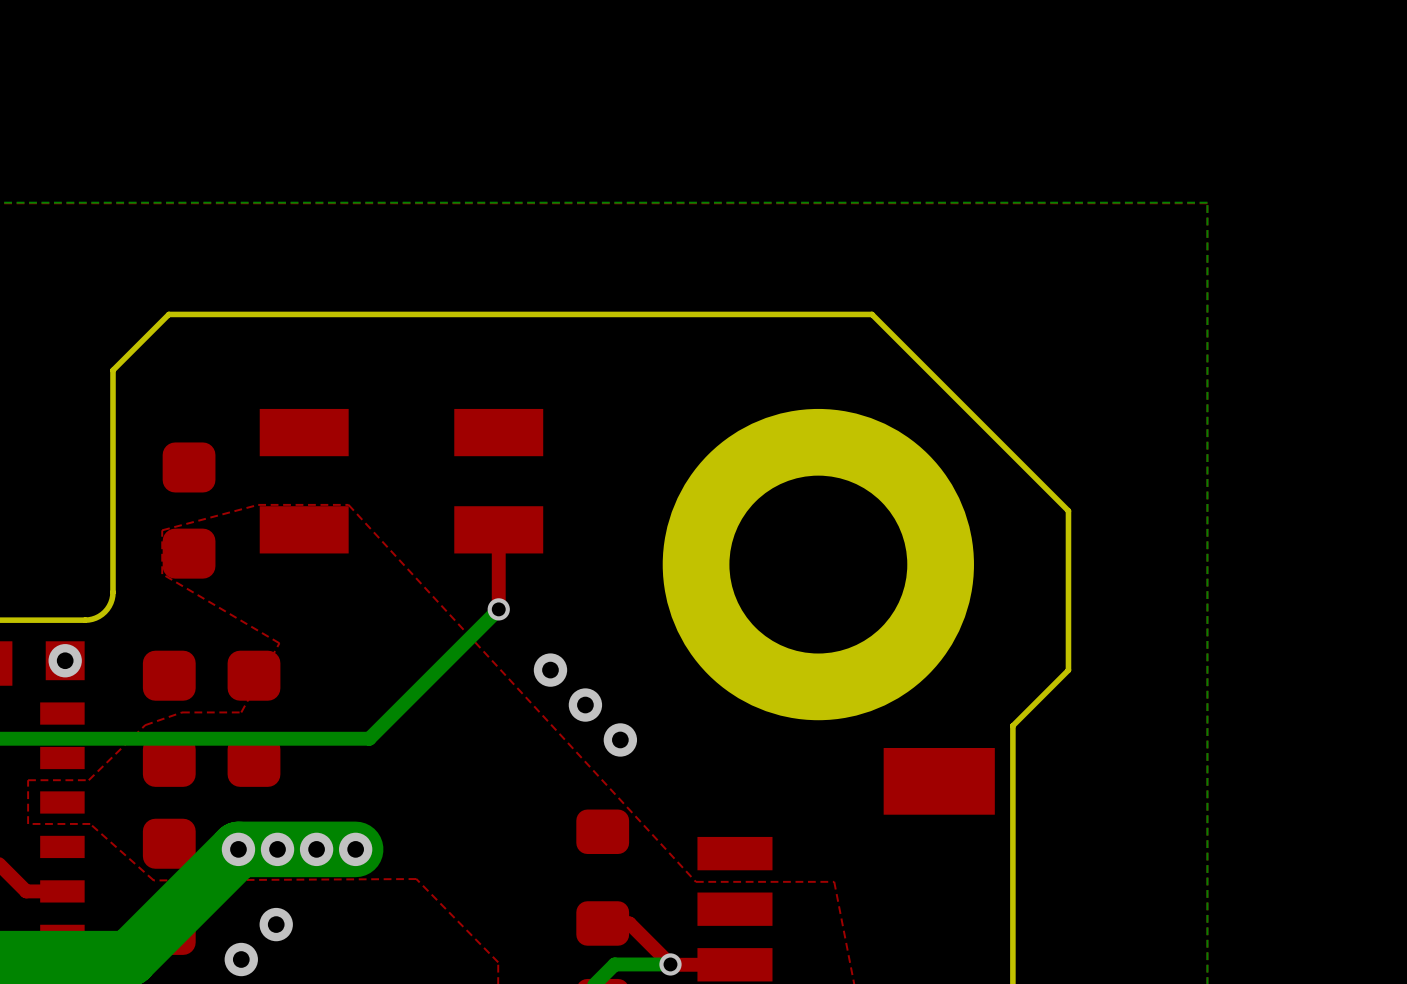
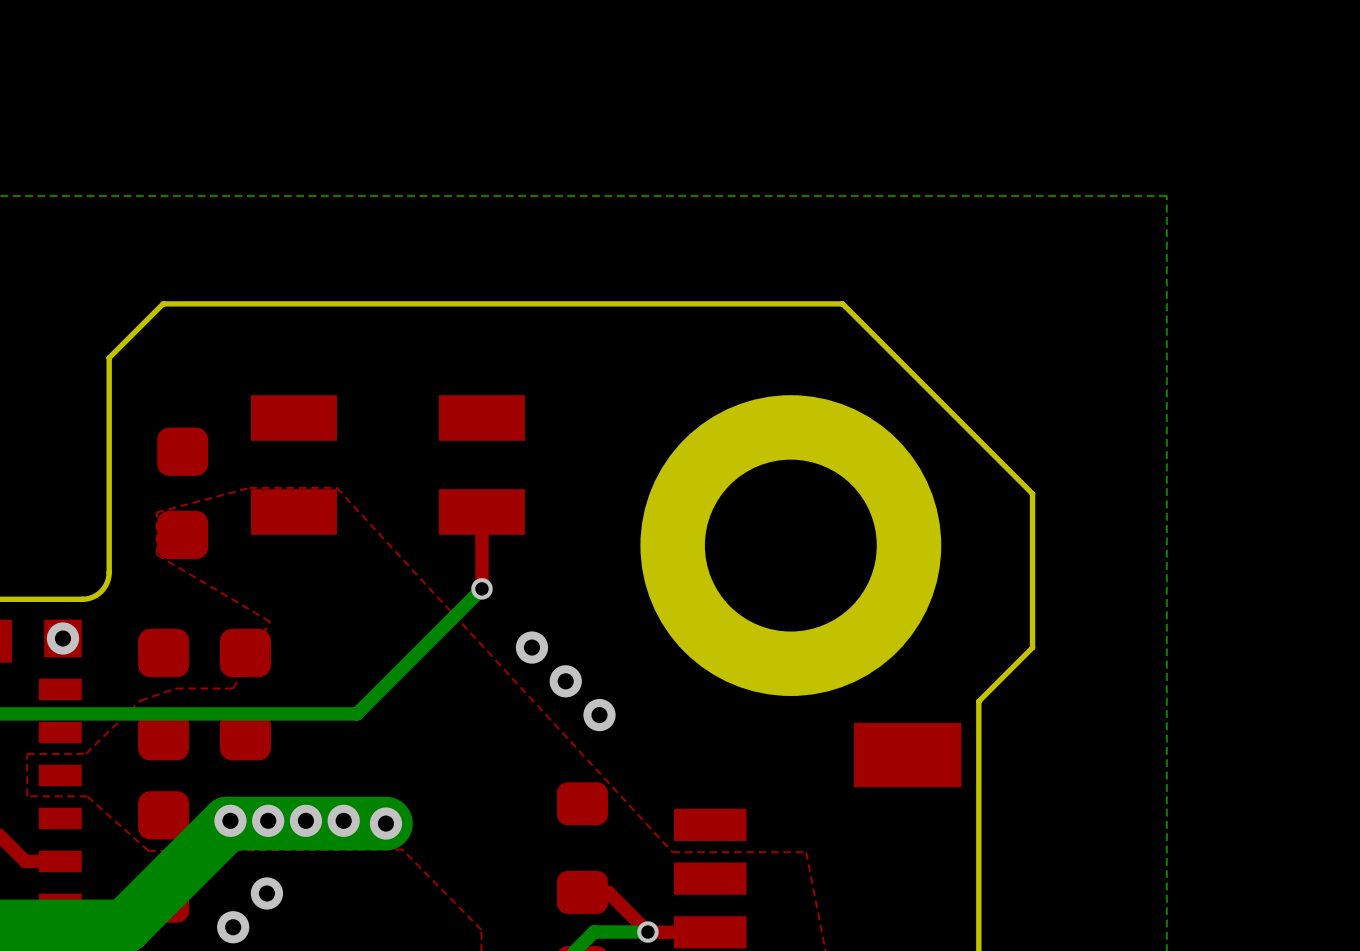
bottom track: (355, 849) (238, 849) (235, 852) -> (385, 823) (227, 823)
via: none -> (385, 823)

